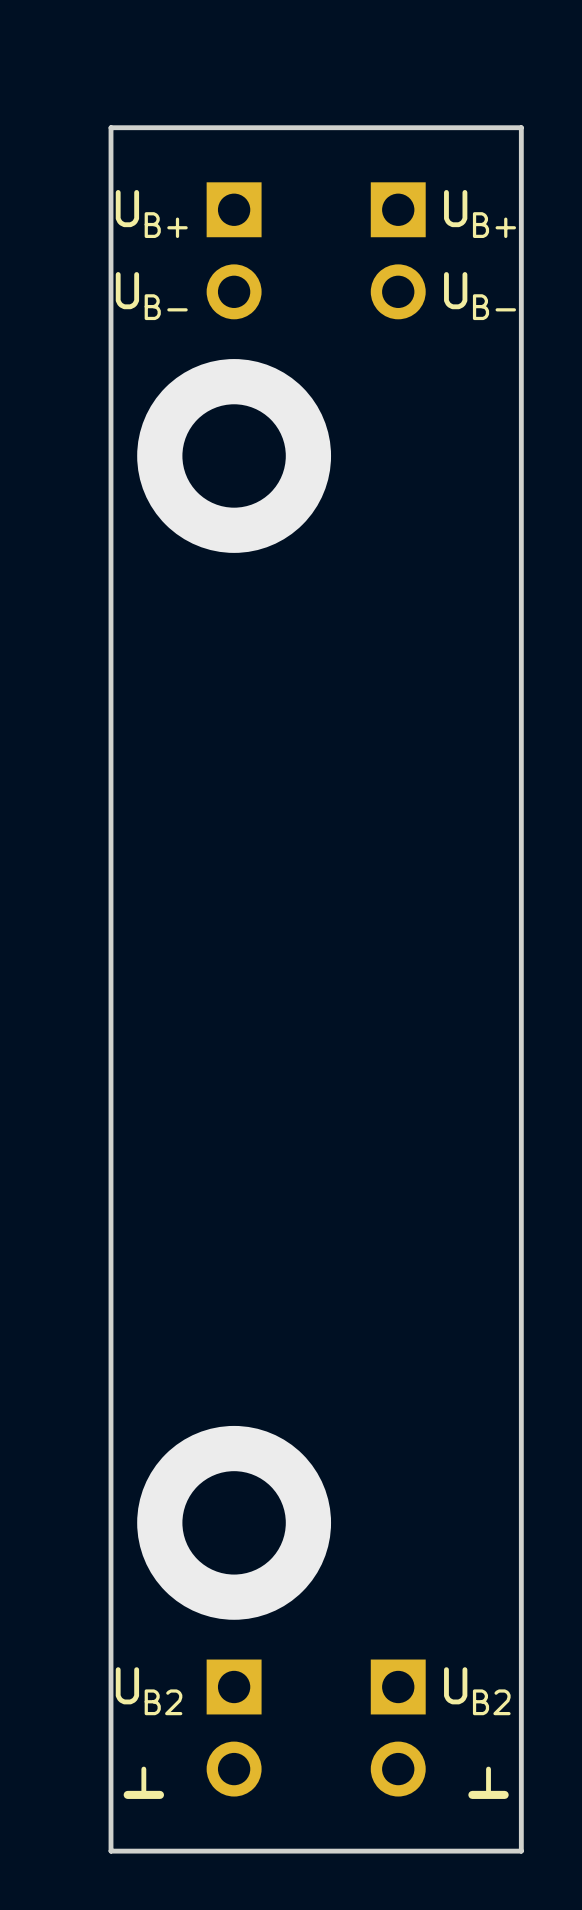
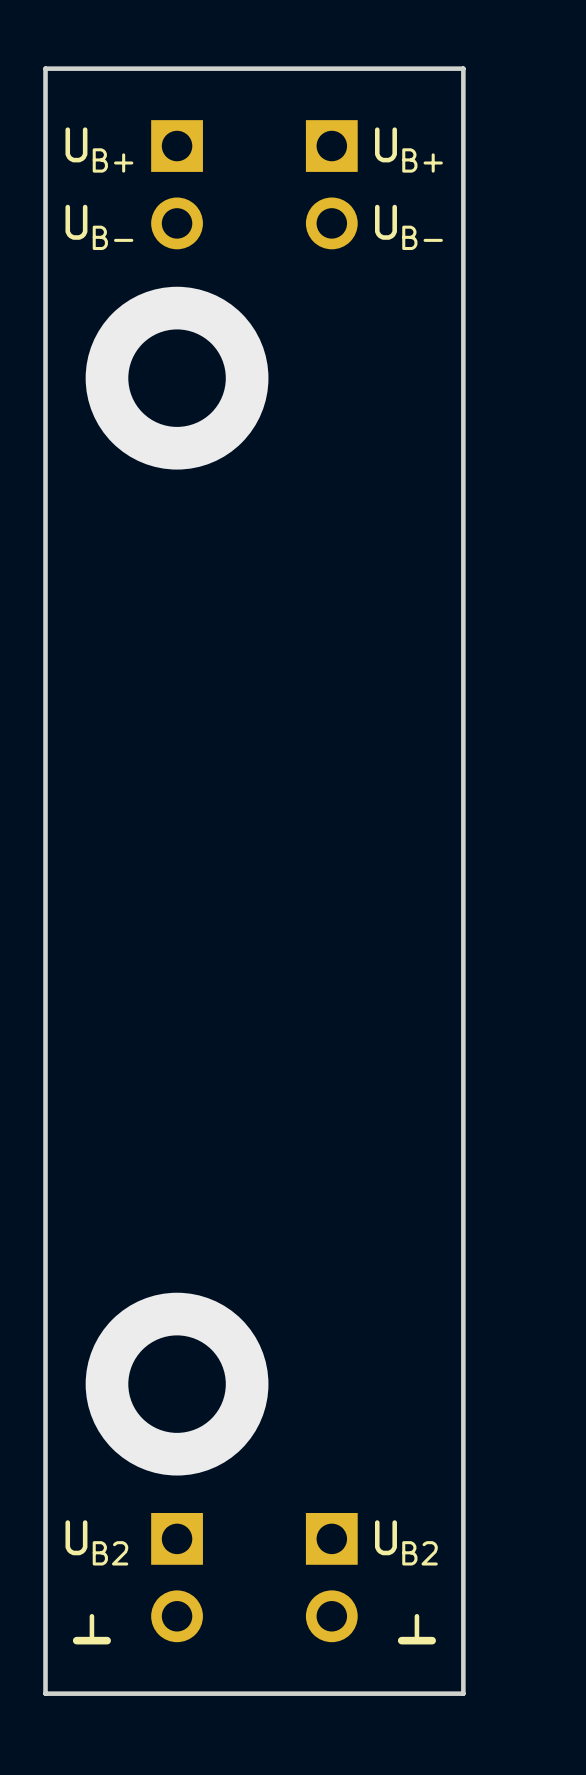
board edge: (111, 127) (111, 1851) -> (60, 68) (45, 68) (45, 1693) (60, 1693)
board edge: (521, 127) (521, 1851) -> (447, 68) (463, 68) (463, 1693) (447, 1693)

